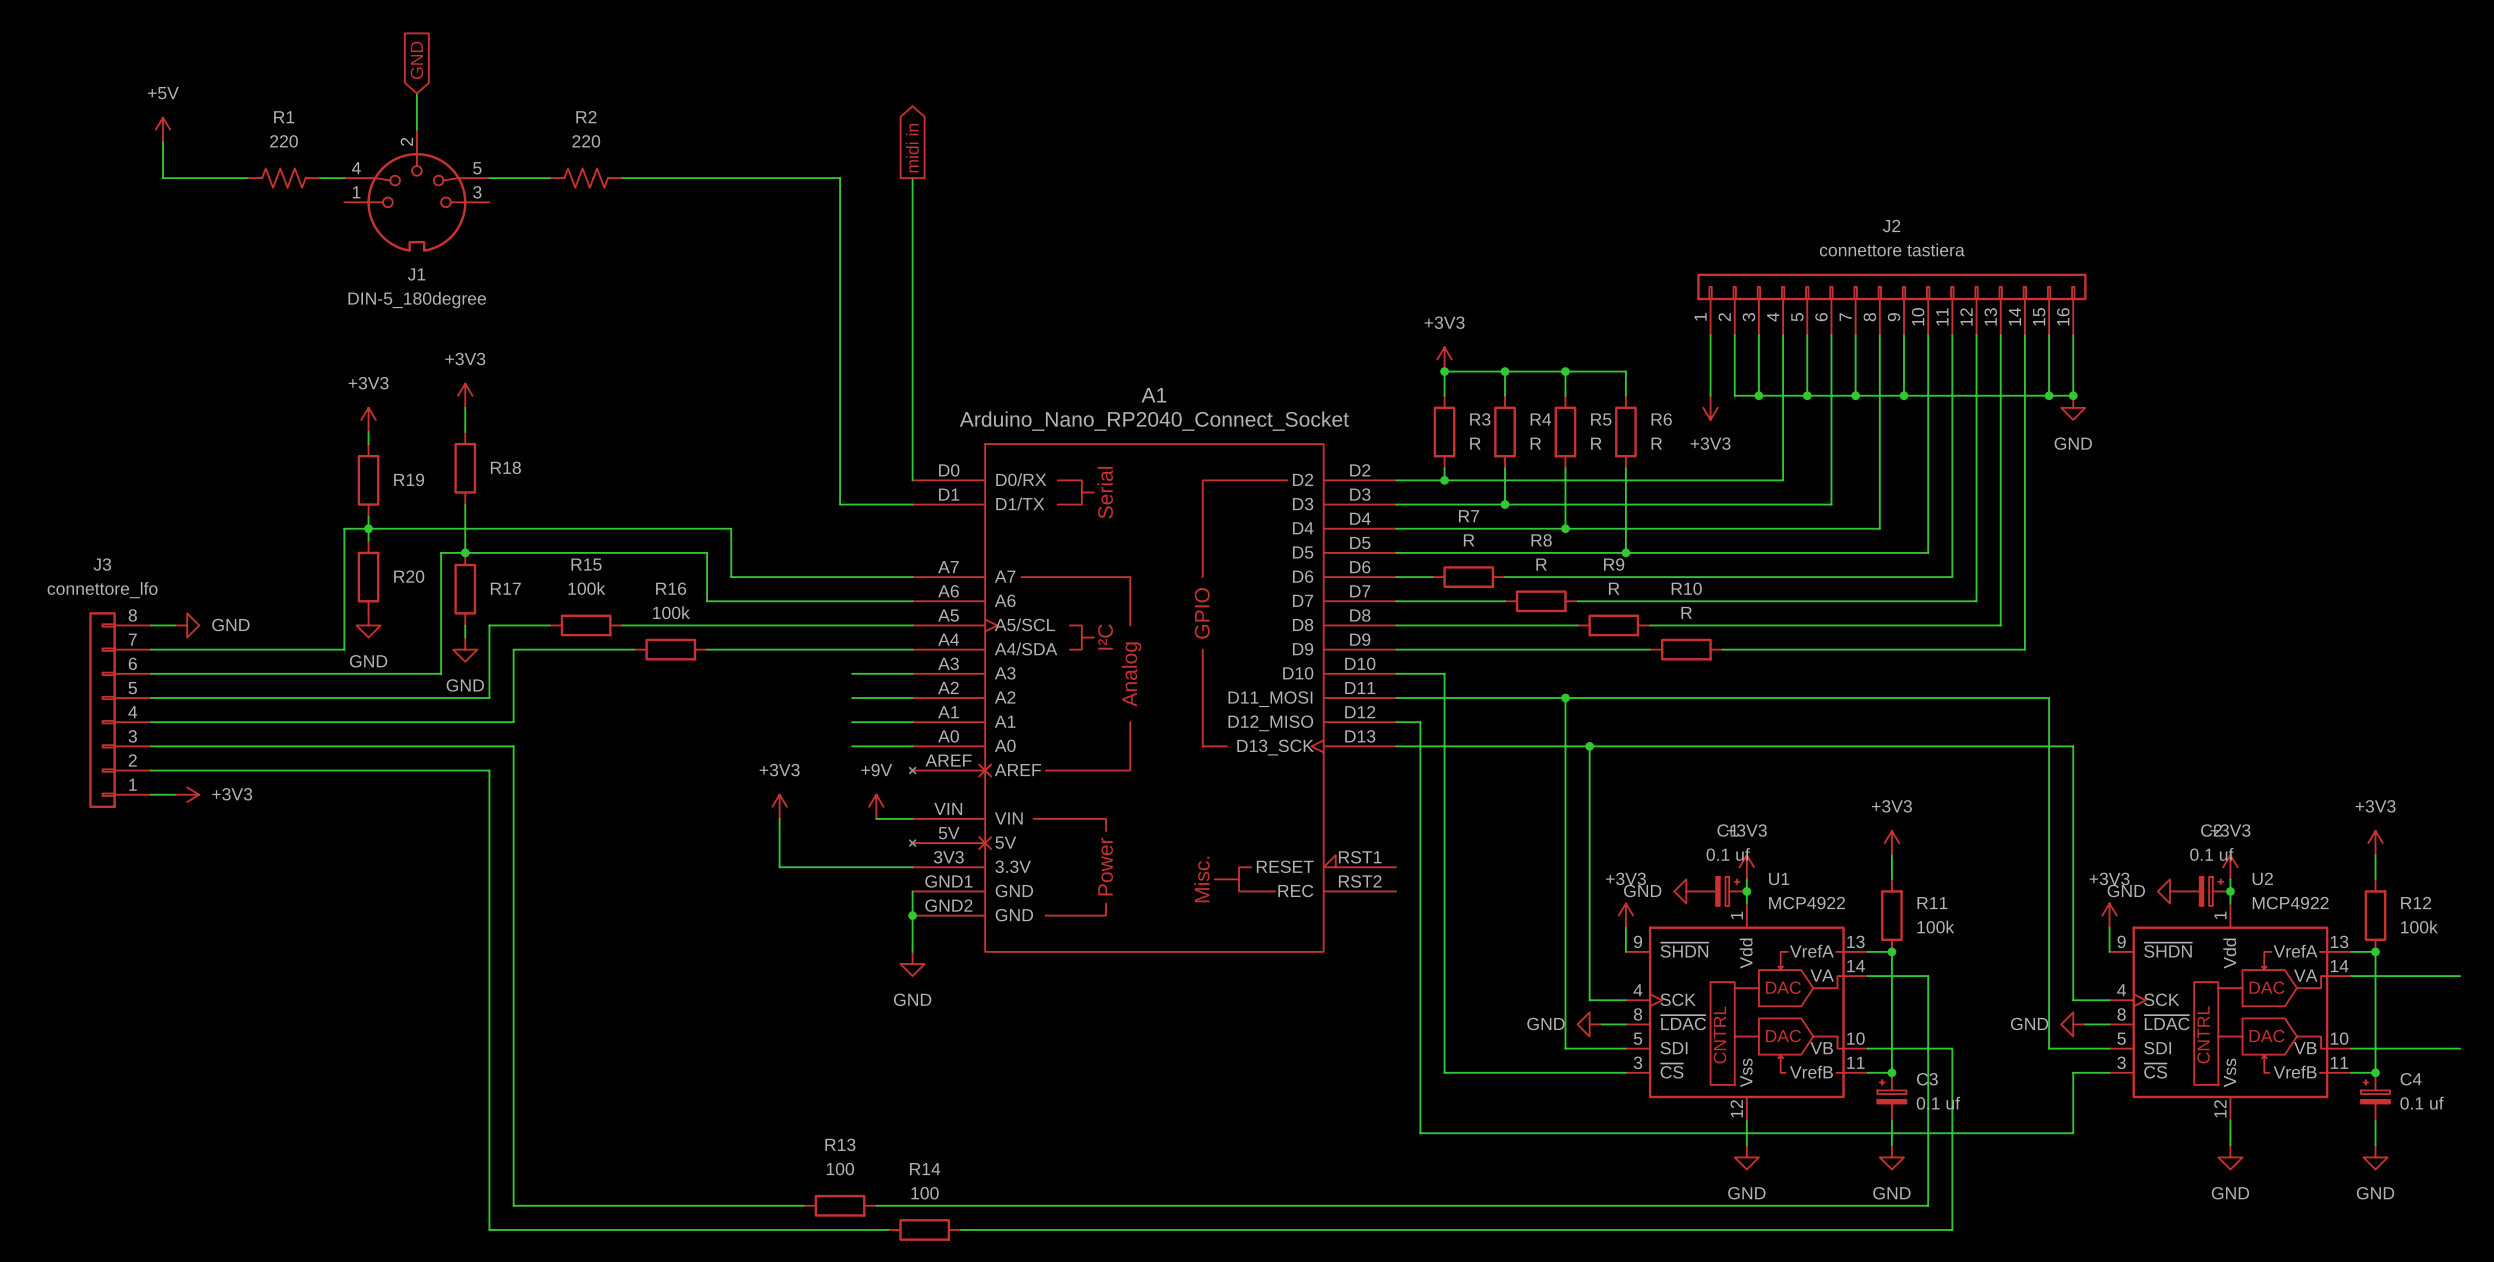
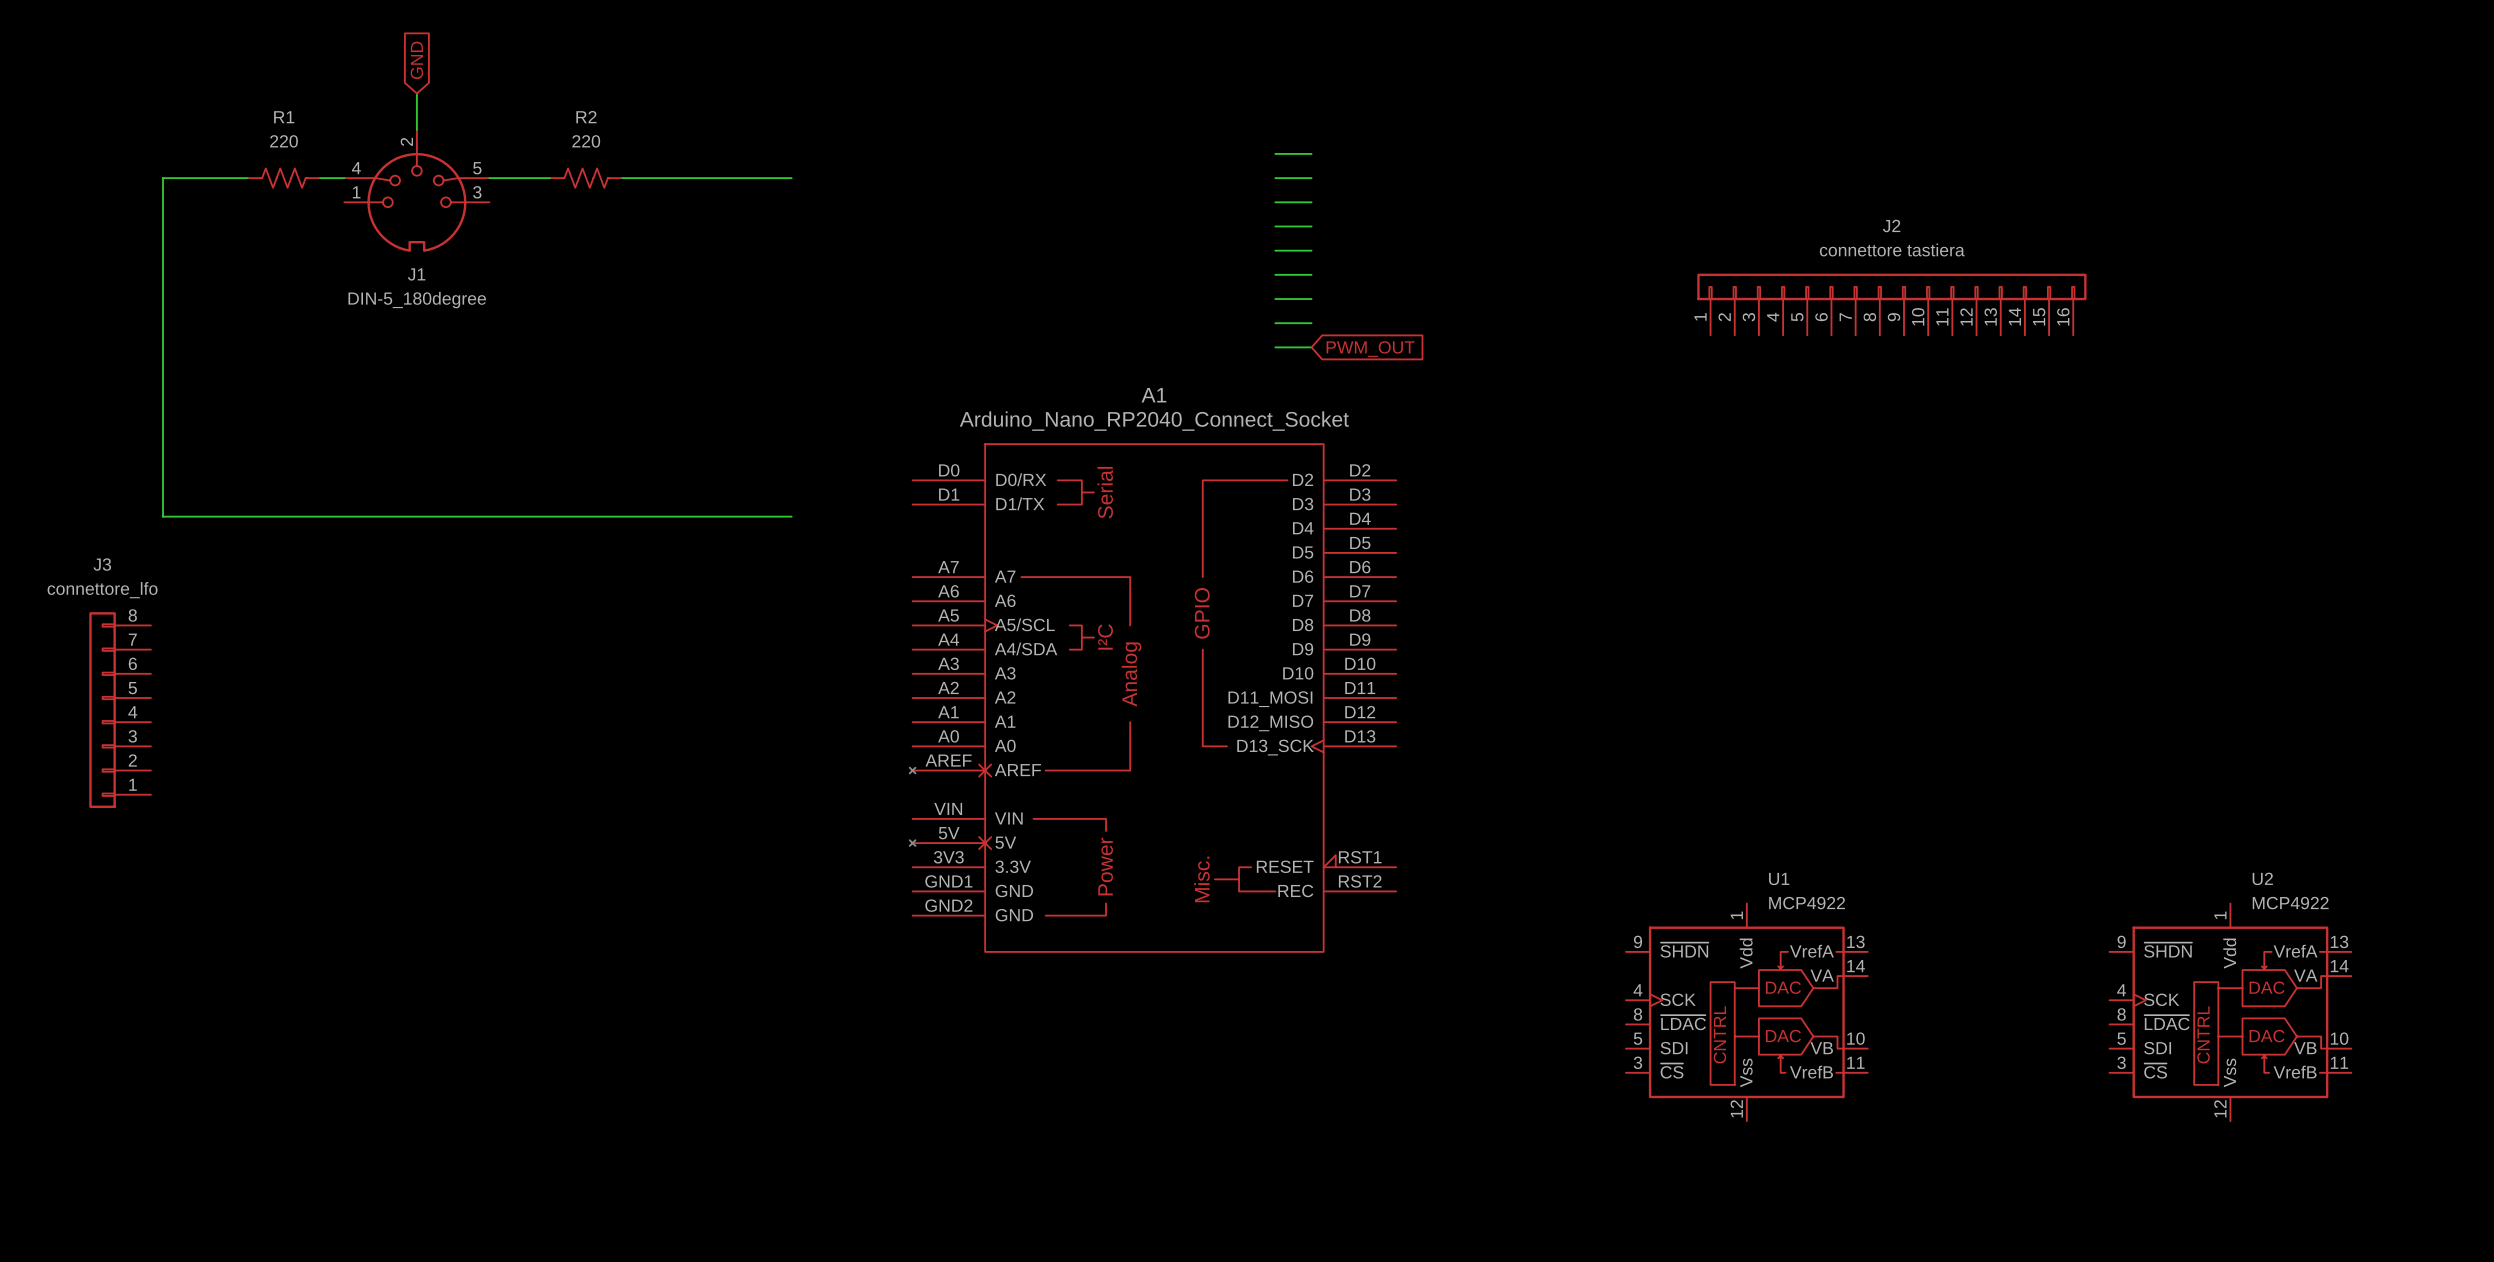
power symbol: +5V (163, 129) -> none
wire: (163, 141) (163, 178) -> (791, 516) (163, 516) (163, 178)
global label: midi in (912, 148) -> none
wire: none -> (1275, 153) (1311, 153)
wire: (791, 178) (840, 178) (840, 504) (912, 504) -> none
wire: (912, 178) (912, 480) -> none
wire: none -> (1275, 178) (1311, 178)
wire: none -> (1275, 202) (1311, 202)
wire: none -> (1275, 226) (1311, 226)
wire: none -> (1275, 250) (1311, 250)
wire: none -> (1275, 274) (1311, 274)
wire: none -> (1275, 299) (1311, 299)
wire: none -> (1275, 323) (1311, 323)
wire: (1710, 335) (1710, 395) -> none
wire: (1734, 335) (1734, 395) (2073, 395) (2073, 335) -> none
wire: (1758, 335) (1758, 395) -> none
wire: (1783, 335) (1783, 480) (1396, 480) -> none
wire: (1807, 335) (1807, 395) -> none
wire: (1831, 335) (1831, 504) (1396, 504) -> none
wire: (1855, 335) (1855, 395) -> none
wire: (1879, 335) (1879, 528) (1396, 528) -> none
wire: (1903, 335) (1903, 395) -> none
wire: (1928, 335) (1928, 552) (1396, 552) -> none
wire: (1952, 335) (1952, 577) (1505, 577) -> none
wire: (1976, 335) (1976, 601) (1577, 601) -> none
wire: (2000, 335) (2000, 625) (1650, 625) -> none
wire: (2024, 335) (2024, 649) (1722, 649) -> none
wire: (2049, 335) (2049, 395) -> none
wire: none -> (1275, 347) (1311, 347)
global label: none -> PWM_OUT (1370, 349)
power symbol: +3V3 (1444, 359) -> none
junction: (1444, 371) -> none
wire: (1505, 371) (1505, 395) -> none
junction: (1505, 371) -> none
wire: (1565, 371) (1565, 395) -> none
junction: (1565, 371) -> none
power symbol: +3V3 (465, 395) -> none
wire: (1444, 395) (1444, 371) (1625, 371) (1625, 395) -> none
junction: (1758, 395) -> none
junction: (1807, 395) -> none
junction: (1855, 395) -> none
junction: (1903, 395) -> none
junction: (2049, 395) -> none
junction: (2073, 395) -> none
wire: (465, 407) (465, 432) -> none
power symbol: +3V3 (1710, 407) -> none
power symbol: GND (2073, 407) -> none
power symbol: +3V3 (368, 419) -> none
wire: (368, 432) (368, 444) -> none
R3: R (1444, 432) -> none
R4: R (1505, 432) -> none
R5: R (1565, 432) -> none
R6: R (1625, 432) -> none
R18: (465, 468) -> none
wire: (1444, 468) (1444, 480) -> none
wire: (1505, 468) (1505, 504) -> none
wire: (1565, 468) (1565, 528) -> none
wire: (1625, 468) (1625, 552) -> none
R19: (368, 480) -> none
junction: (1444, 480) -> none
wire: (465, 504) (465, 552) -> none
junction: (1505, 504) -> none
wire: (368, 516) (368, 540) -> none
junction: (368, 528) -> none
junction: (1565, 528) -> none
junction: (465, 552) -> none
junction: (1625, 552) -> none
R20: (368, 577) -> none
wire: (912, 577) (731, 577) (731, 528) (344, 528) (344, 649) (150, 649) -> none
wire: (1396, 577) (1432, 577) -> none
R7: R (1468, 577) -> none
R17: (465, 589) -> none
wire: (912, 601) (707, 601) (707, 552) (441, 552) (441, 673) (150, 673) -> none
wire: (1396, 601) (1505, 601) -> none
R8: R (1541, 601) -> none
wire: (150, 625) (175, 625) -> none
power symbol: GND (187, 625) -> none
power symbol: GND (368, 625) -> none
wire: (465, 625) (465, 637) -> none
wire: (549, 625) (489, 625) (489, 698) (150, 698) -> none
R15: 100k (586, 625) -> none
wire: (622, 625) (912, 625) -> none
wire: (1396, 625) (1577, 625) -> none
R9: R (1613, 625) -> none
power symbol: GND (465, 649) -> none
wire: (634, 649) (513, 649) (513, 722) (150, 722) -> none
R16: 100k (670, 649) -> none
wire: (707, 649) (912, 649) -> none
wire: (1396, 649) (1650, 649) -> none
R10: R (1686, 649) -> none
wire: (852, 673) (912, 673) -> none
wire: (1396, 673) (1444, 673) (1444, 1072) (1625, 1072) -> none
wire: (852, 698) (912, 698) -> none
wire: (1396, 698) (2049, 698) (2049, 1048) (2109, 1048) -> none
wire: (1565, 698) (1565, 1048) (1625, 1048) -> none
junction: (1565, 698) -> none
wire: (852, 722) (912, 722) -> none
wire: (1396, 722) (1420, 722) (1420, 1133) (2073, 1133) (2073, 1072) (2109, 1072) -> none
wire: (150, 746) (513, 746) (513, 1205) (803, 1205) -> none
wire: (852, 746) (912, 746) -> none
wire: (1396, 746) (2073, 746) (2073, 1000) (2109, 1000) -> none
wire: (1589, 746) (1589, 1000) (1625, 1000) -> none
junction: (1589, 746) -> none
wire: (150, 770) (489, 770) (489, 1229) (888, 1229) -> none
wire: (150, 794) (175, 794) -> none
power symbol: +3V3 (187, 794) -> none
power symbol: +3V3 (779, 806) -> none
power symbol: +9V (876, 806) -> none
wire: (779, 818) (779, 867) (912, 867) -> none
wire: (876, 818) (912, 818) -> none
power symbol: +3V3 (1891, 843) -> none
power symbol: +3V3 (2375, 843) -> none
wire: (1891, 855) (1891, 879) -> none
wire: (2375, 855) (2375, 879) -> none
power symbol: +3V3 (1746, 867) -> none
power symbol: +3V3 (2230, 867) -> none
wire: (1746, 879) (1746, 903) -> none
wire: (2230, 879) (2230, 903) -> none
wire: (912, 891) (912, 951) -> none
power symbol: GND (1686, 891) -> none
C1: 0.1 uf (1722, 891) -> none
junction: (1746, 891) -> none
power symbol: GND (2169, 891) -> none
C2: 0.1 uf (2206, 891) -> none
junction: (2230, 891) -> none
junction: (912, 915) -> none
power symbol: +3V3 (1625, 915) -> none
R11: 100k (1891, 915) -> none
power symbol: +3V3 (2109, 915) -> none
R12: 100k (2375, 915) -> none
wire: (1625, 927) (1625, 951) -> none
wire: (2109, 927) (2109, 951) -> none
wire: (1867, 951) (1891, 951) (1891, 1072) (1867, 1072) -> none
junction: (1891, 951) -> none
wire: (2351, 951) (2375, 951) (2375, 1072) (2351, 1072) -> none
junction: (2375, 951) -> none
power symbol: GND (912, 963) -> none
wire: (1867, 976) (1928, 976) (1928, 1205) (876, 1205) -> none
wire: (2351, 976) (2460, 976) -> none
power symbol: GND (1589, 1024) -> none
wire: (1601, 1024) (1625, 1024) -> none
power symbol: GND (2073, 1024) -> none
wire: (2085, 1024) (2109, 1024) -> none
wire: (1867, 1048) (1952, 1048) (1952, 1229) (960, 1229) -> none
wire: (2351, 1048) (2460, 1048) -> none
junction: (1891, 1072) -> none
junction: (2375, 1072) -> none
C3: 0.1 uf (1891, 1096) -> none
C4: 0.1 uf (2375, 1096) -> none
wire: (1746, 1121) (1746, 1145) -> none
wire: (1891, 1121) (1891, 1145) -> none
wire: (2230, 1121) (2230, 1145) -> none
wire: (2375, 1121) (2375, 1145) -> none
power symbol: GND (1746, 1157) -> none
power symbol: GND (1891, 1157) -> none
power symbol: GND (2230, 1157) -> none
power symbol: GND (2375, 1157) -> none
R13: 100 (840, 1205) -> none
R14: 100 (924, 1229) -> none

